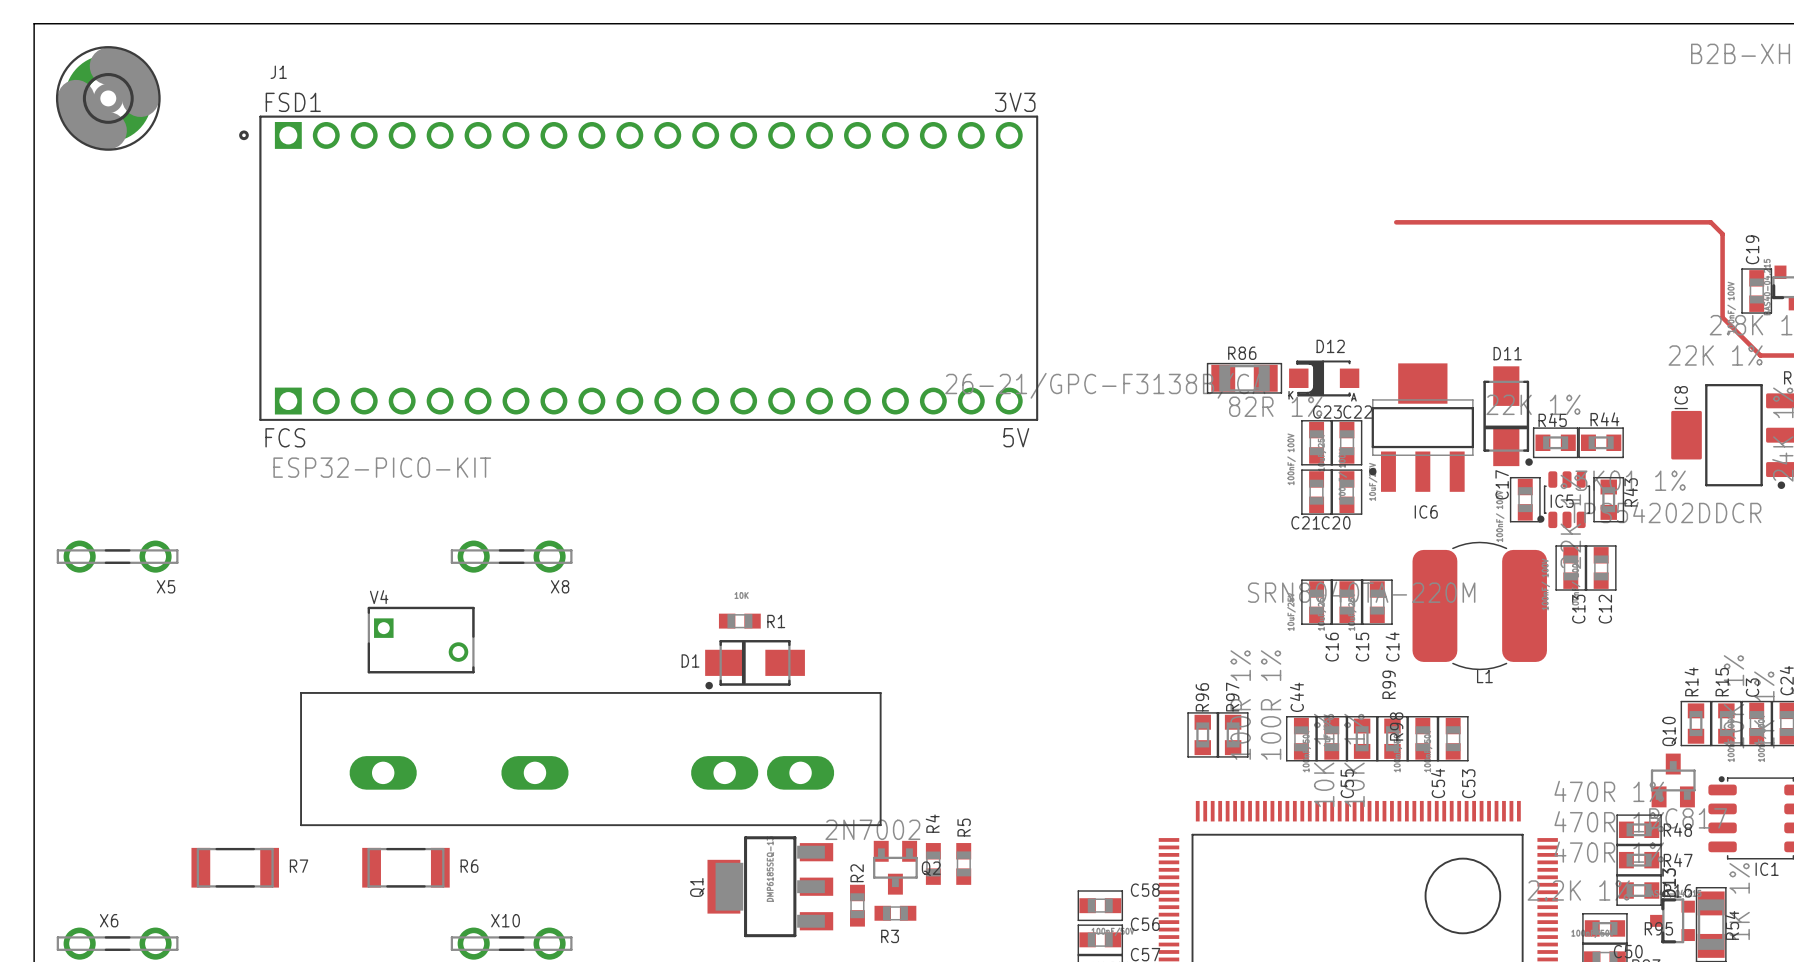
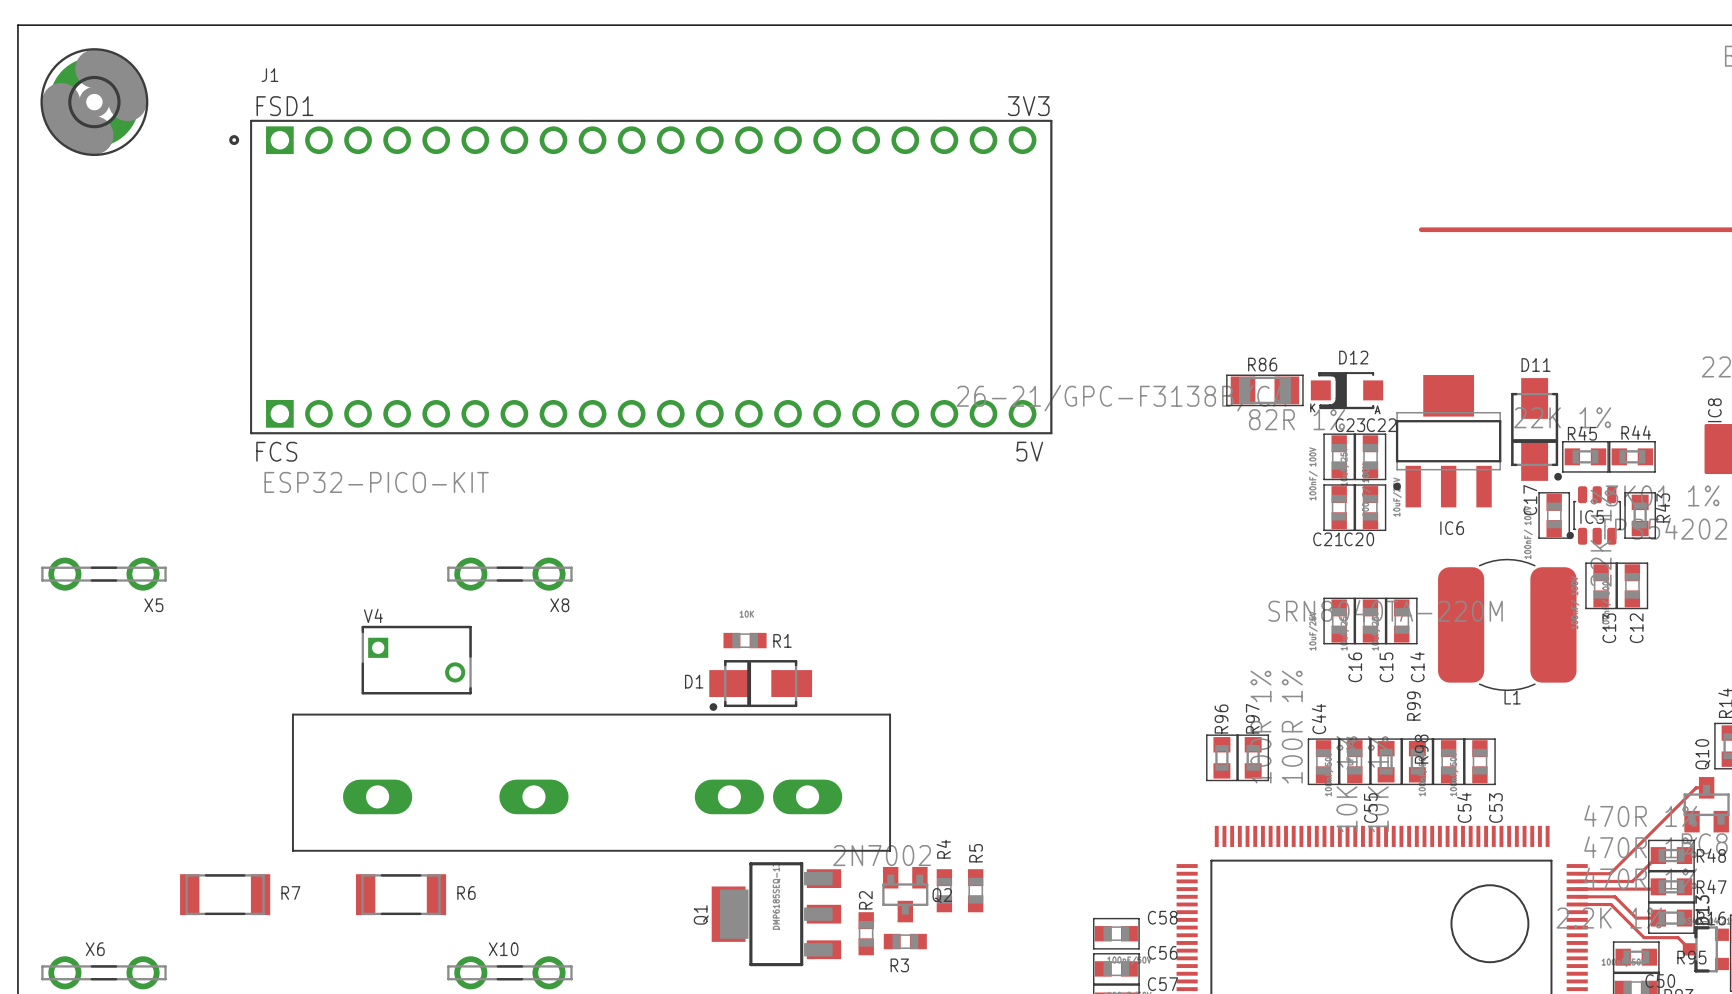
track: none -> (1706, 787) (1696, 787) (1610, 873) (1577, 873)
track: none -> (1658, 855) (1632, 881) (1577, 881)
track: none -> (1658, 886) (1656, 889) (1577, 889)
track: none -> (1577, 896) (1614, 896) (1636, 918) (1658, 918)
track: none -> (1577, 904) (1610, 904) (1644, 937) (1677, 937) (1689, 949)

